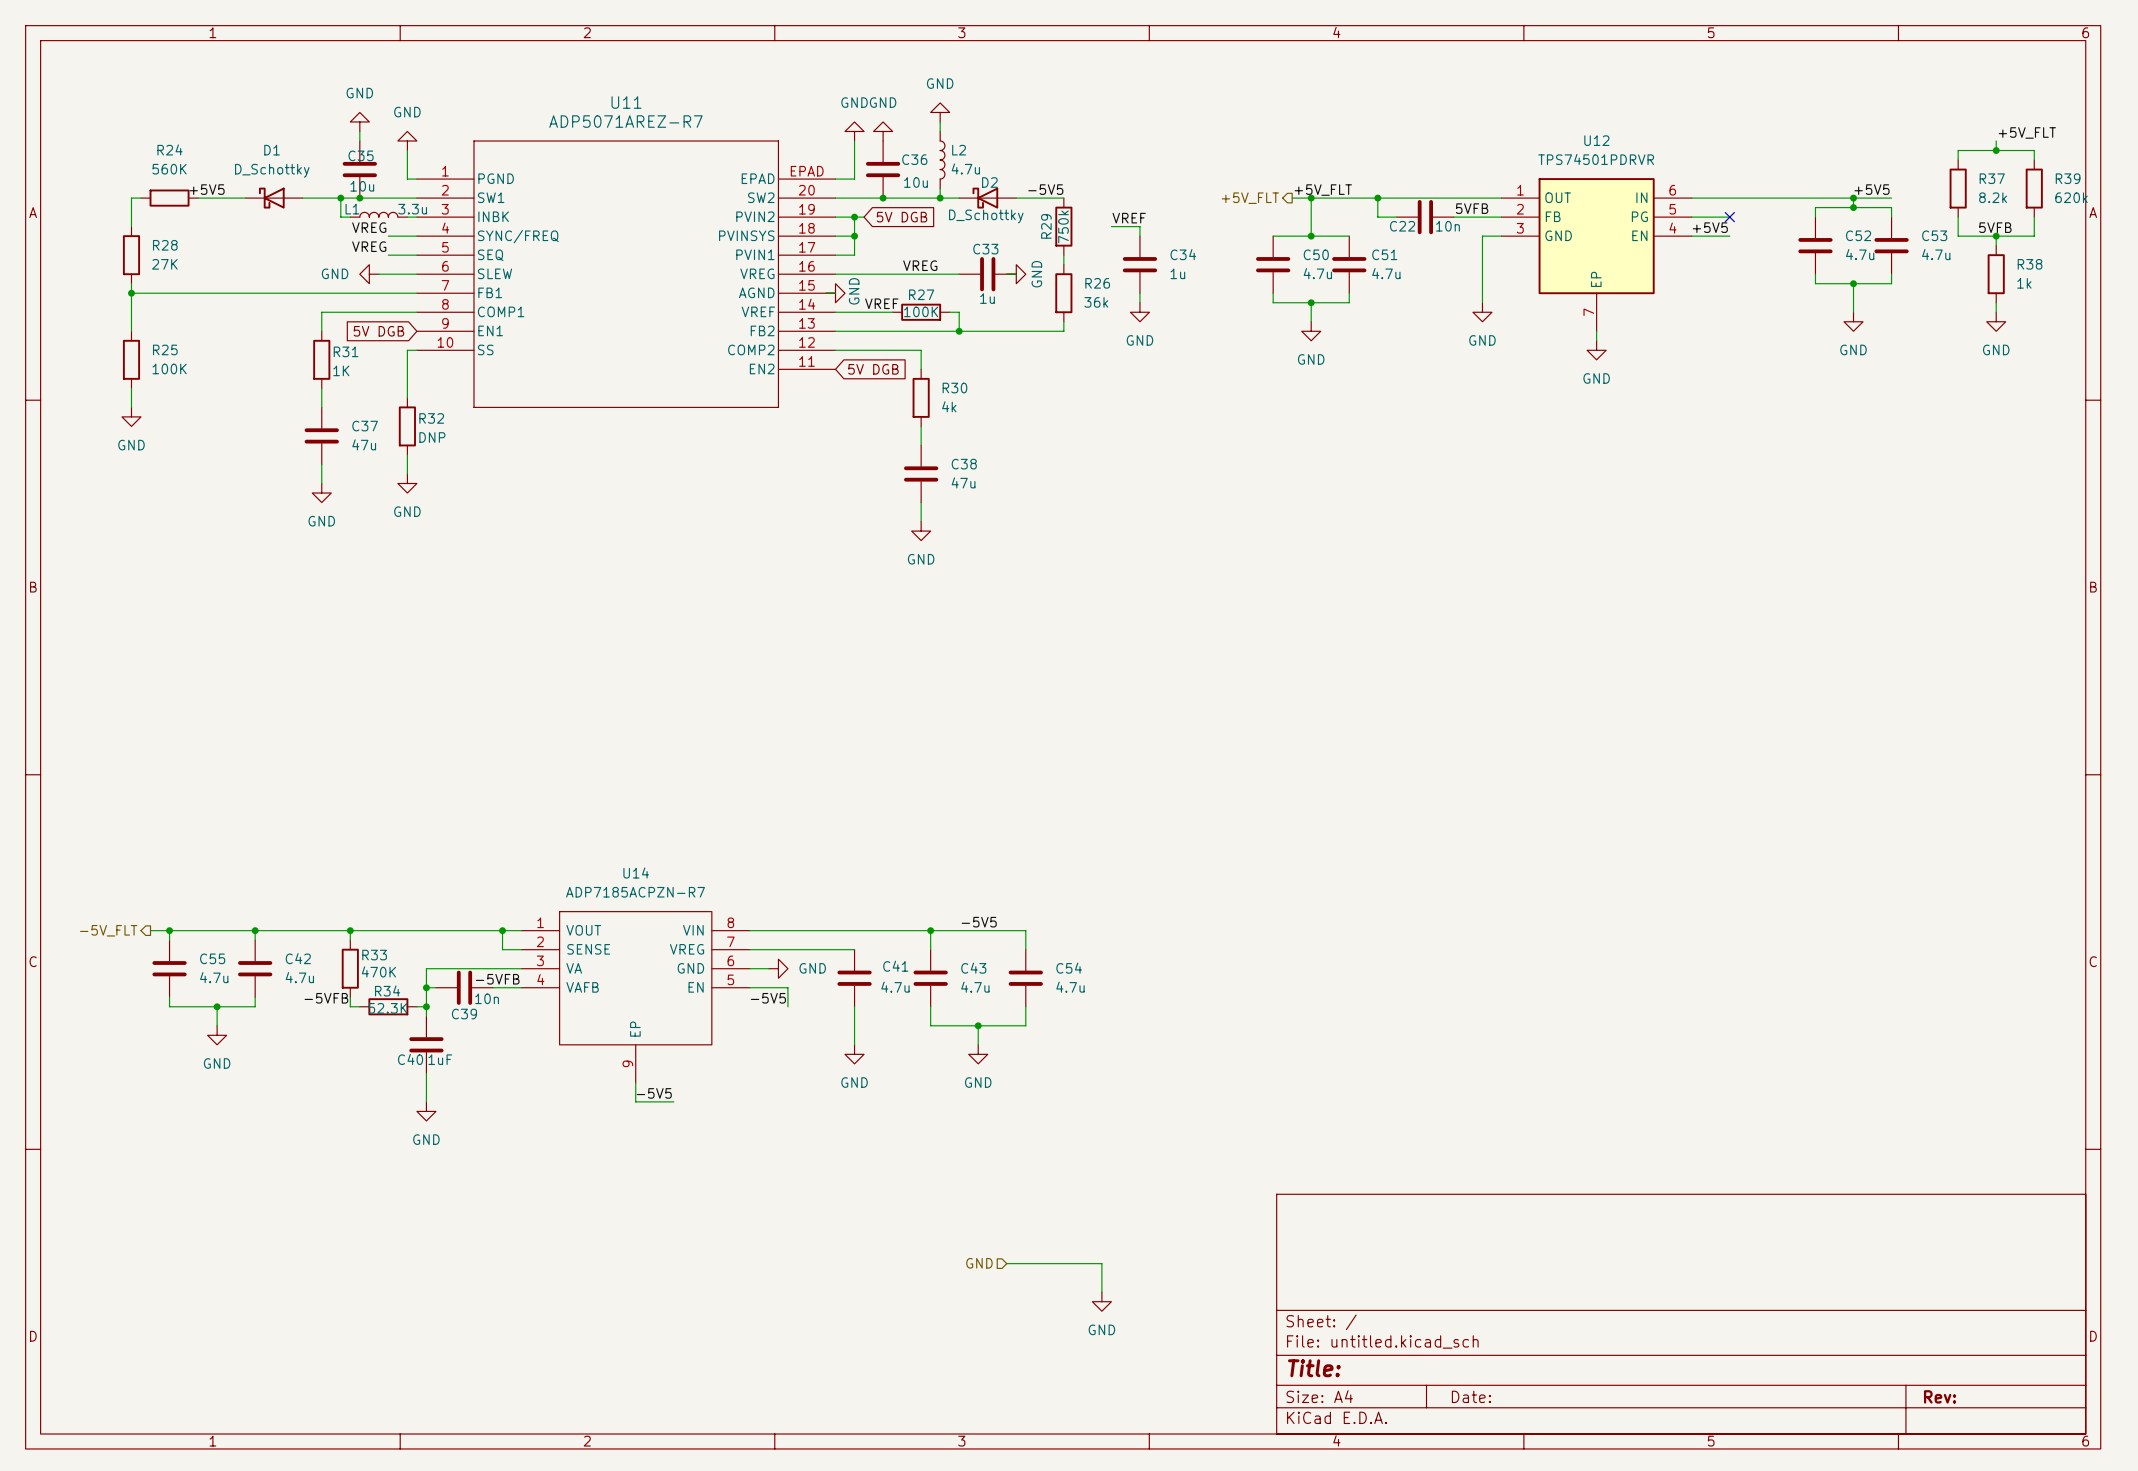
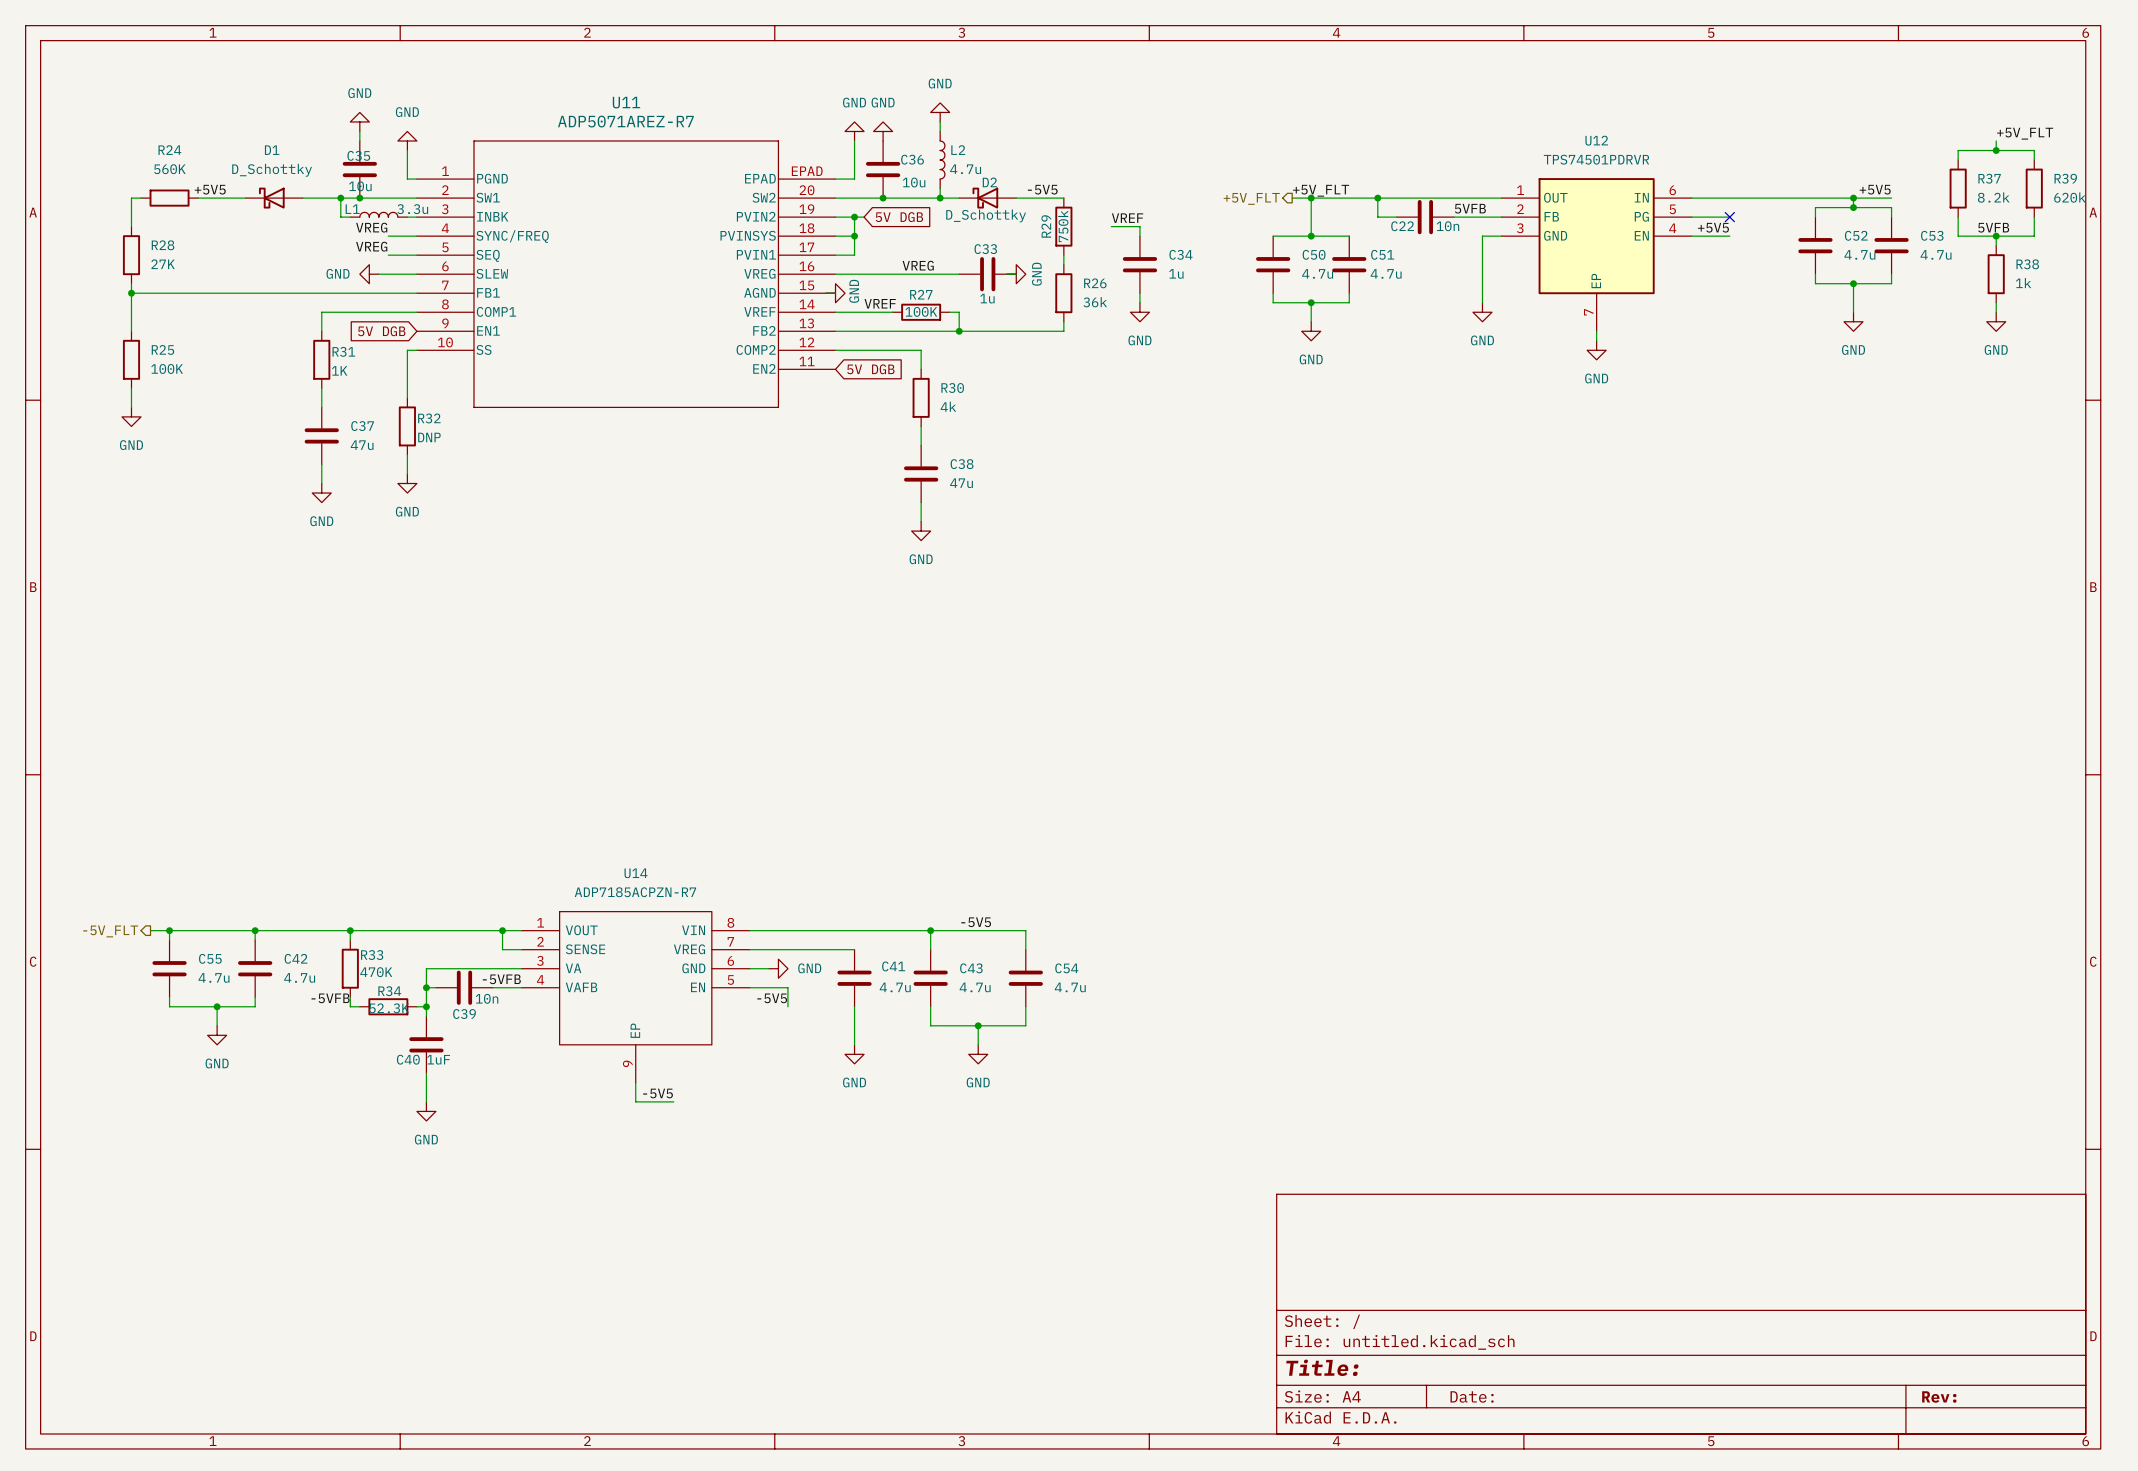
hierarchical label: GND (979, 1263) -> none
wire: (1006, 1263) (1101, 1263) (1101, 1292) -> none
power symbol: GND (1101, 1301) -> none

